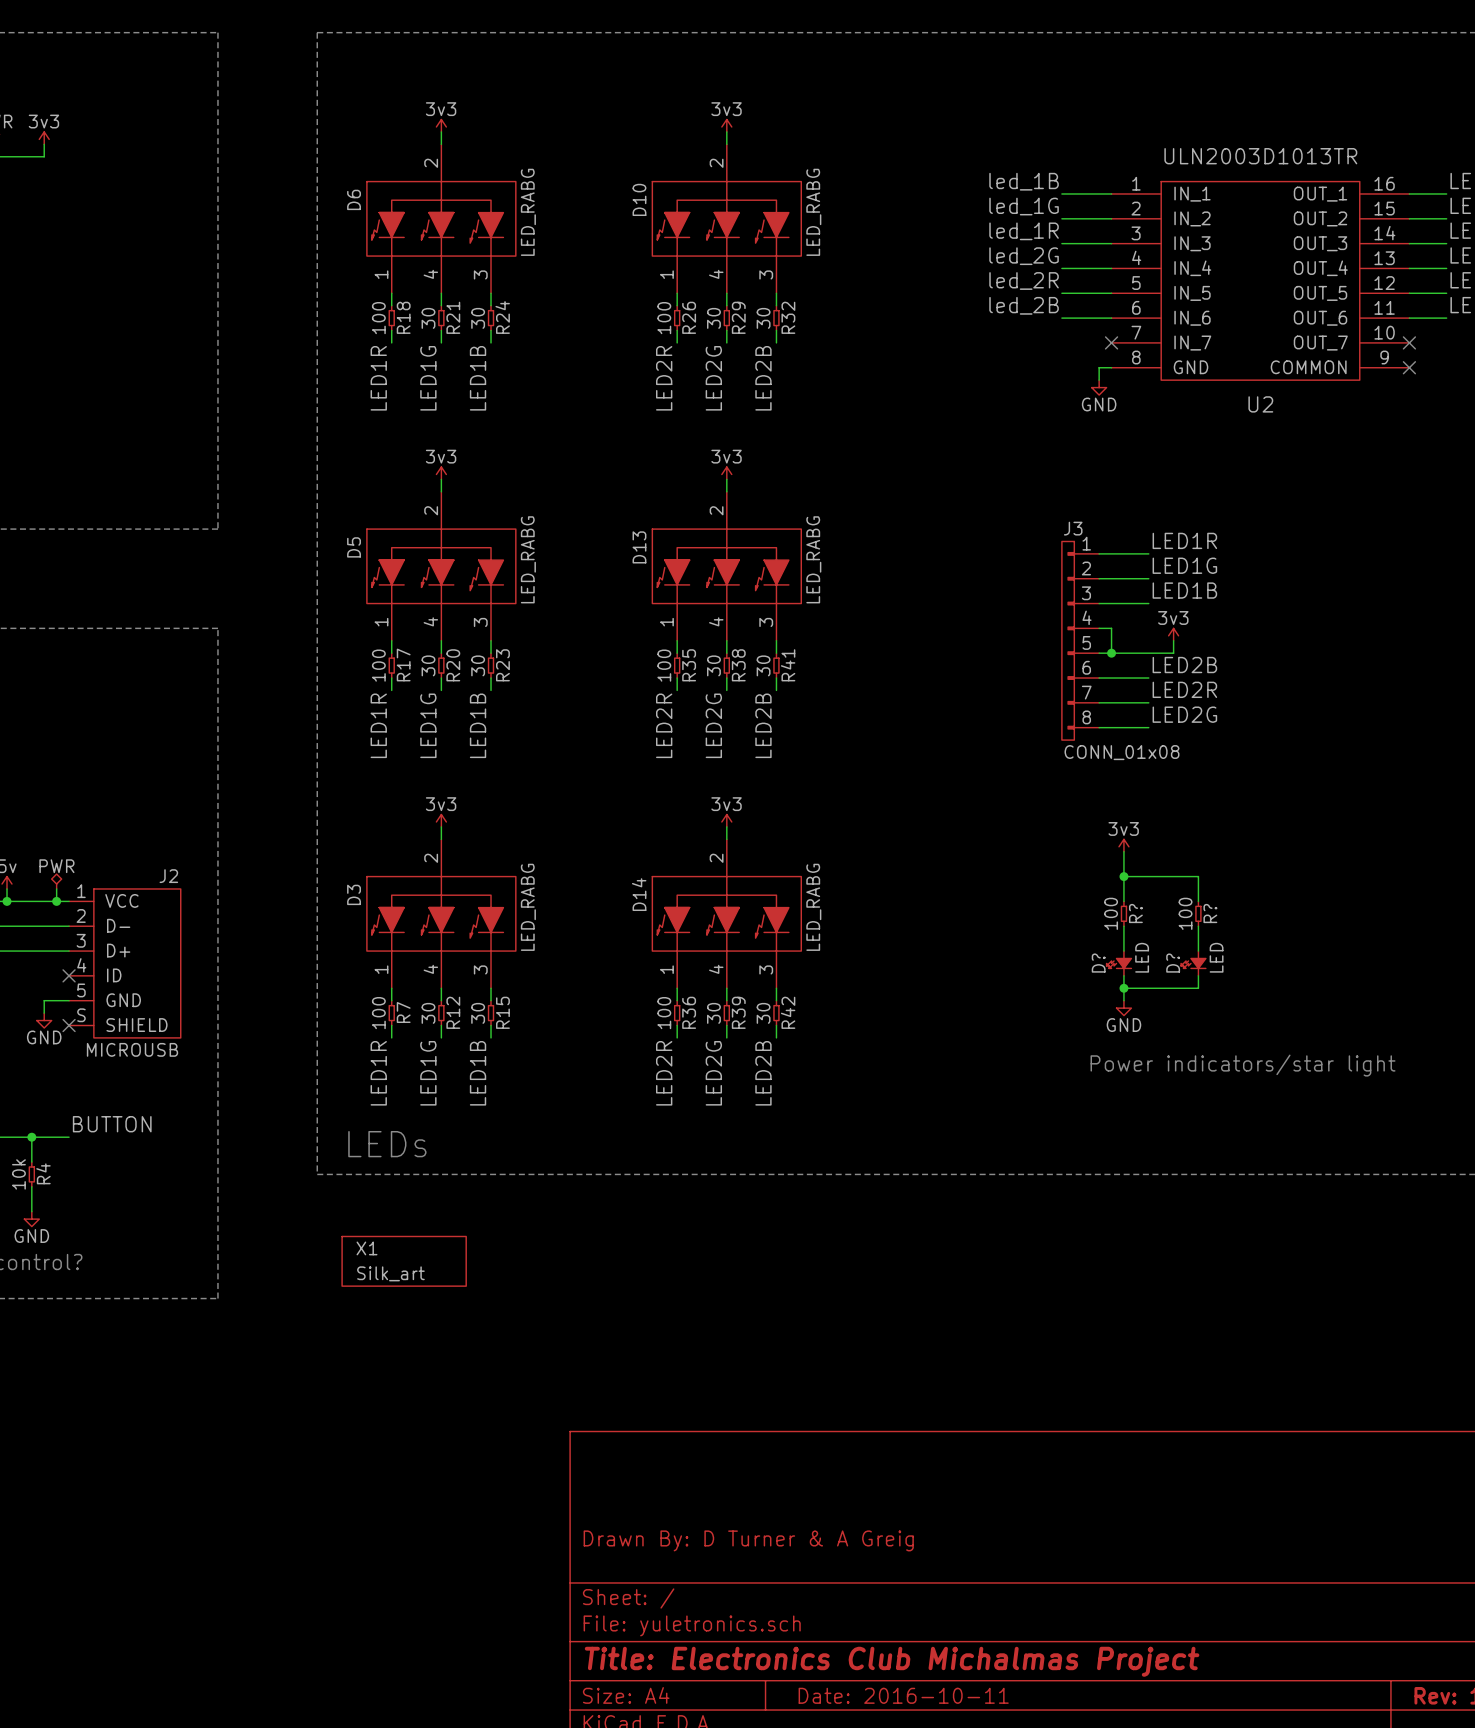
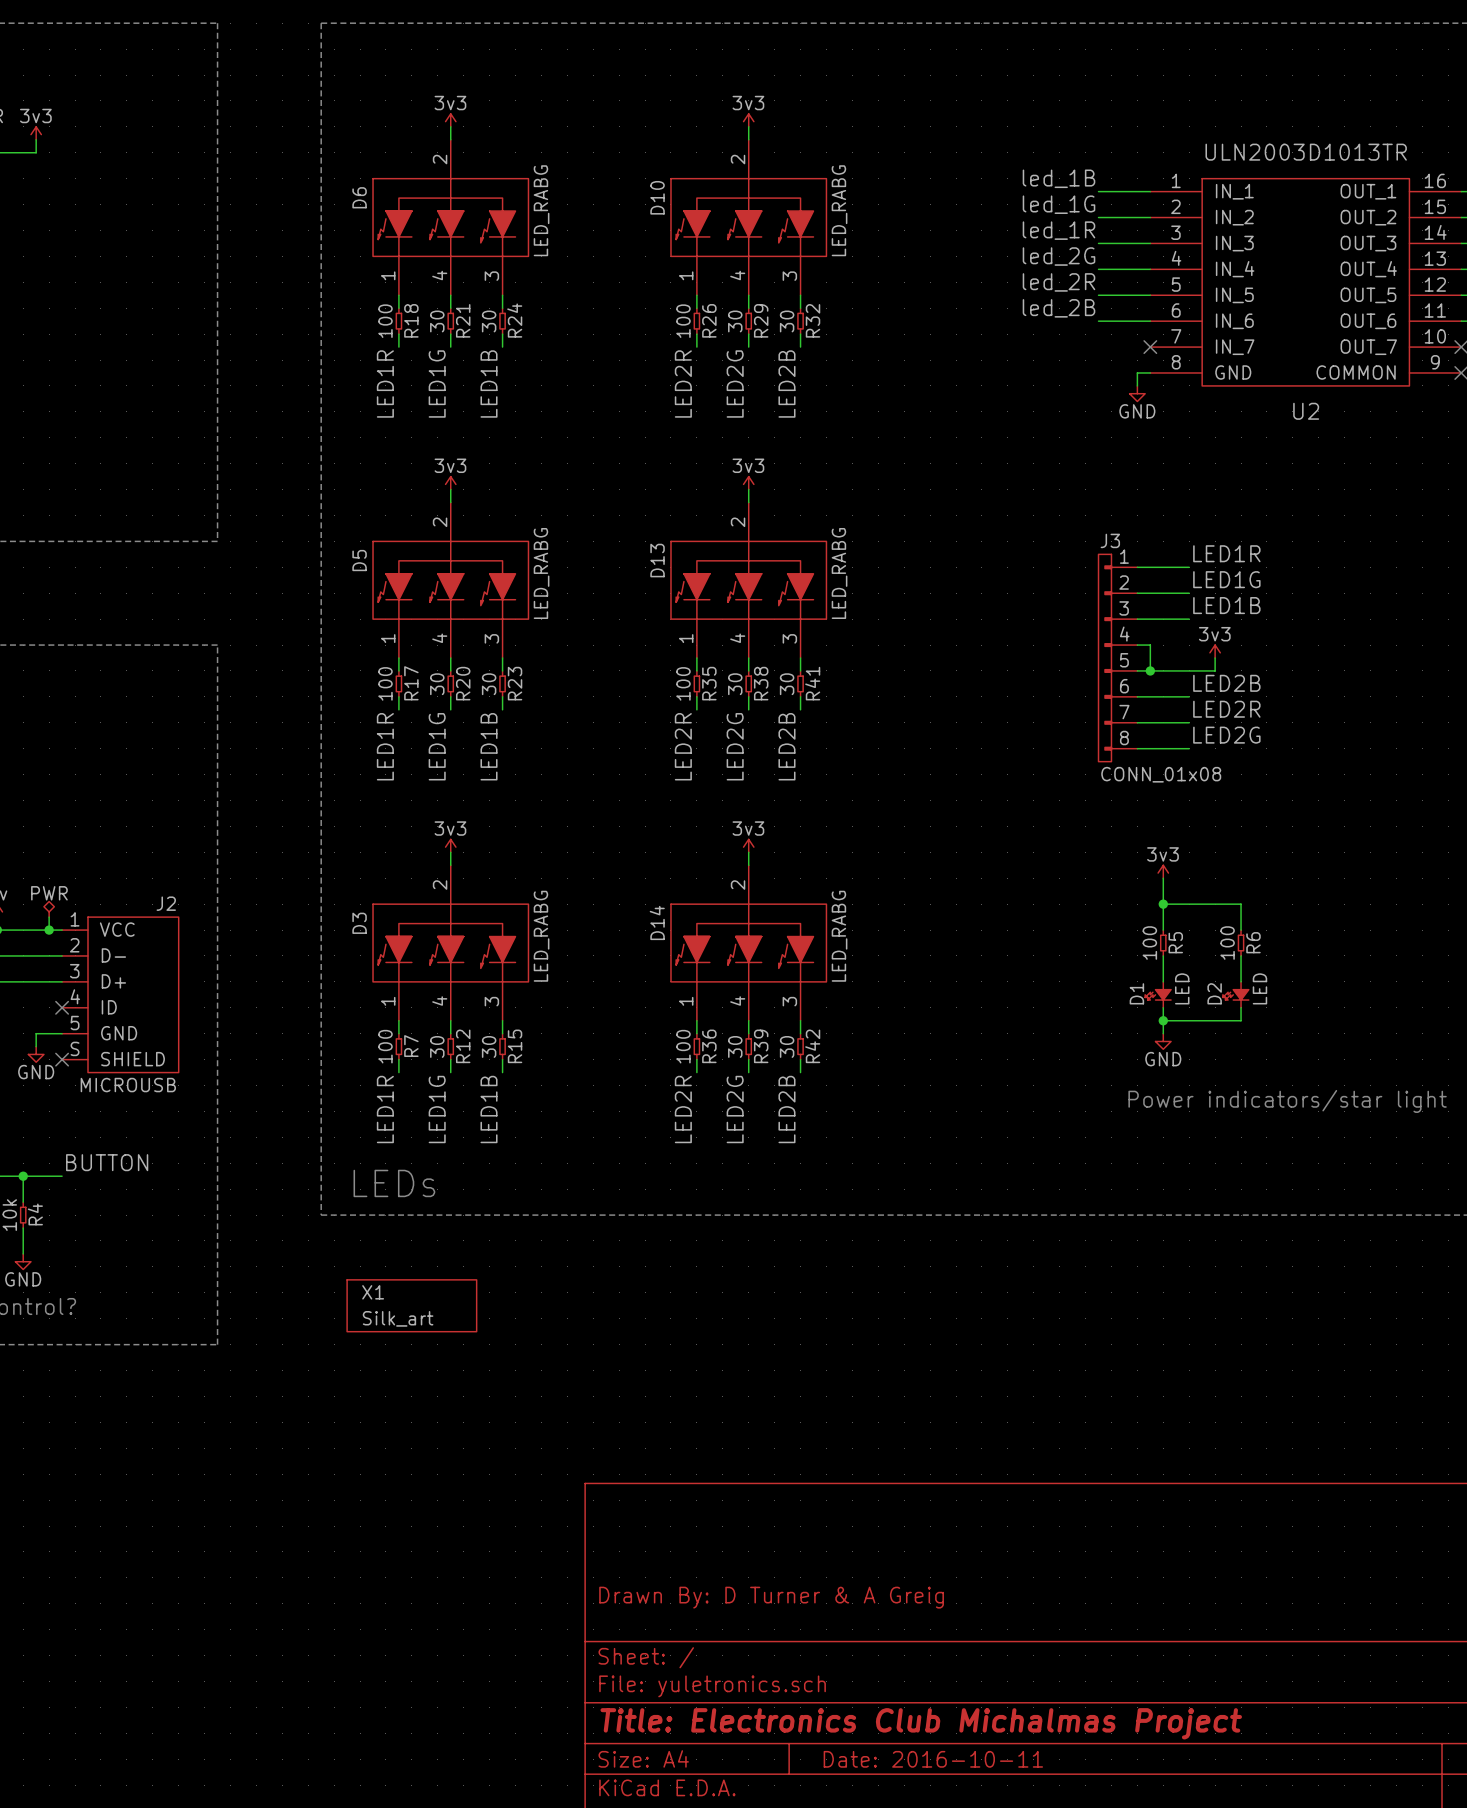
R? name: R? (1135, 913) -> R5 (1175, 942)
R? name: R? (1210, 913) -> R6 (1253, 942)
D? name: D? (1098, 963) -> D1 (1136, 993)
D? name: D? (1173, 963) -> D2 (1214, 993)

